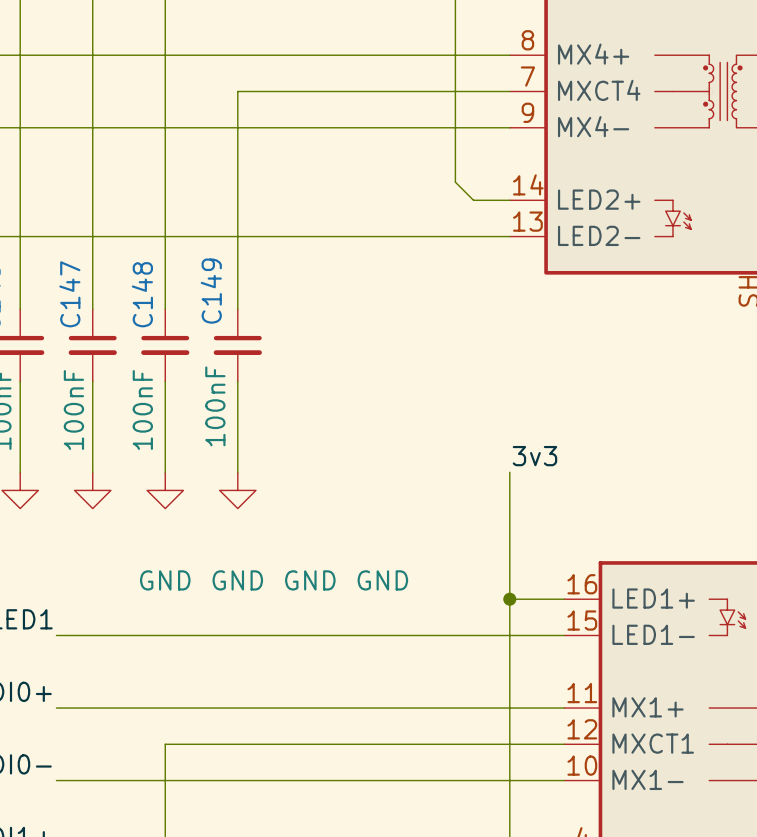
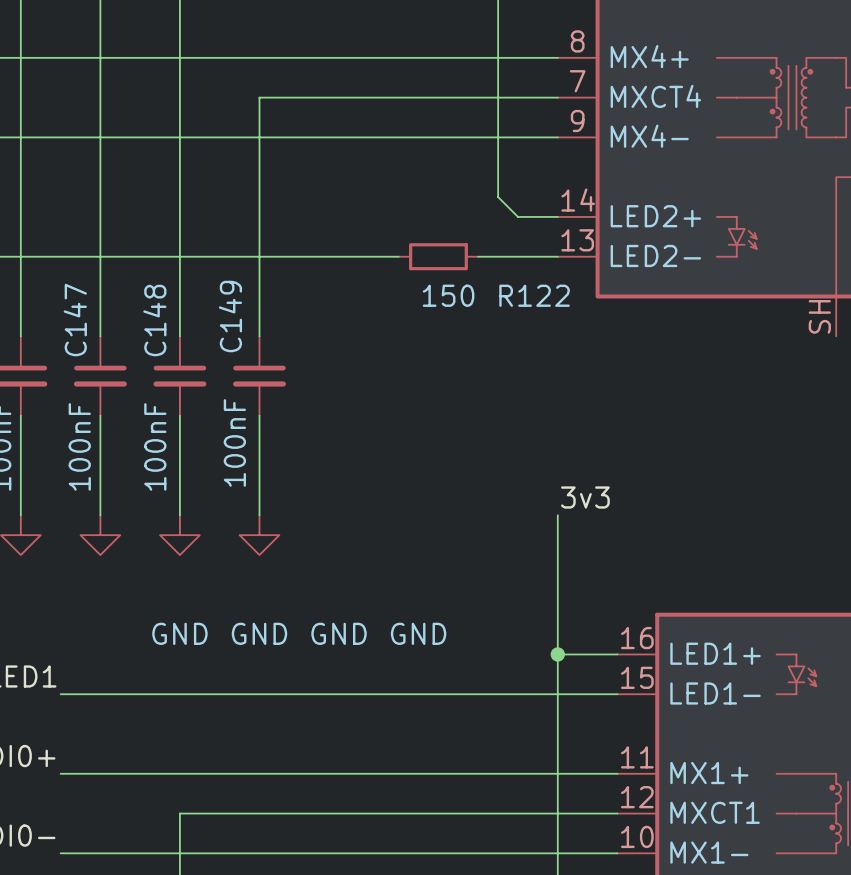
wire: (364, 236) (437, 236) -> none
R122: none -> 150 (438, 256)

